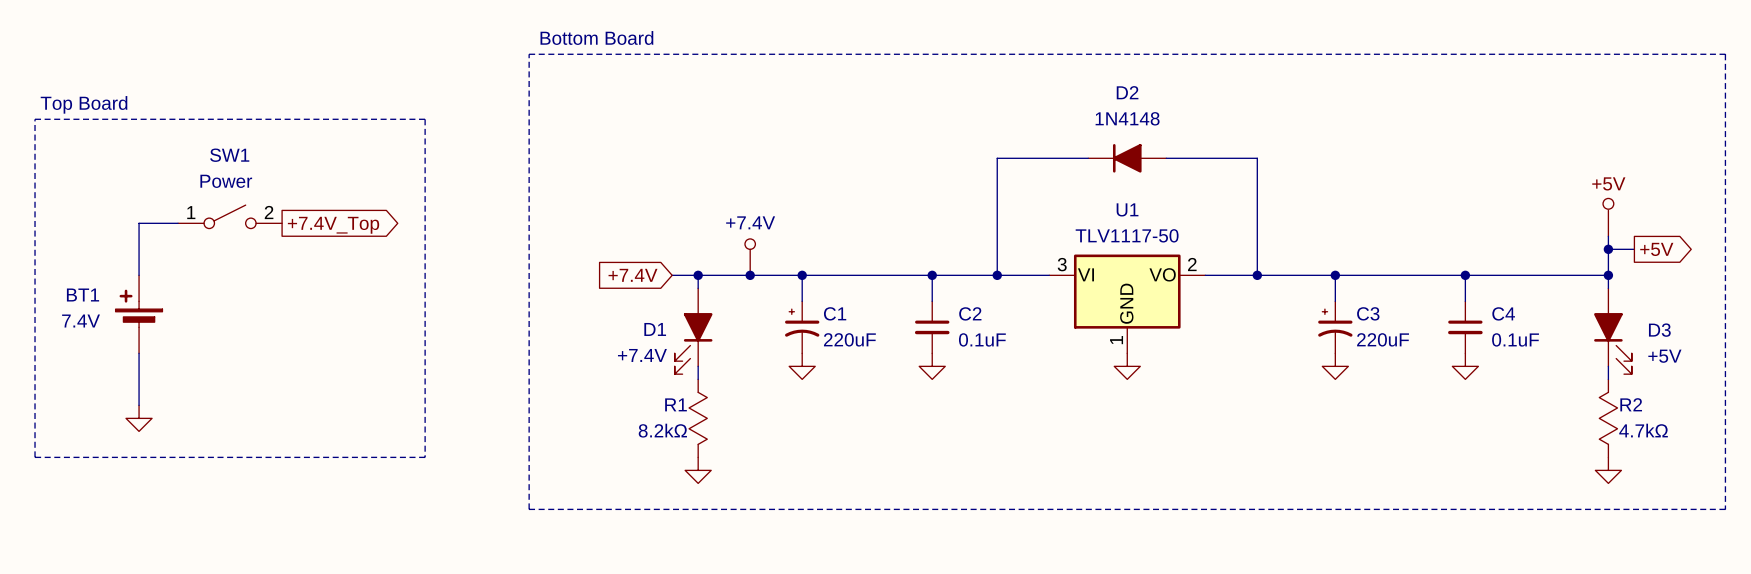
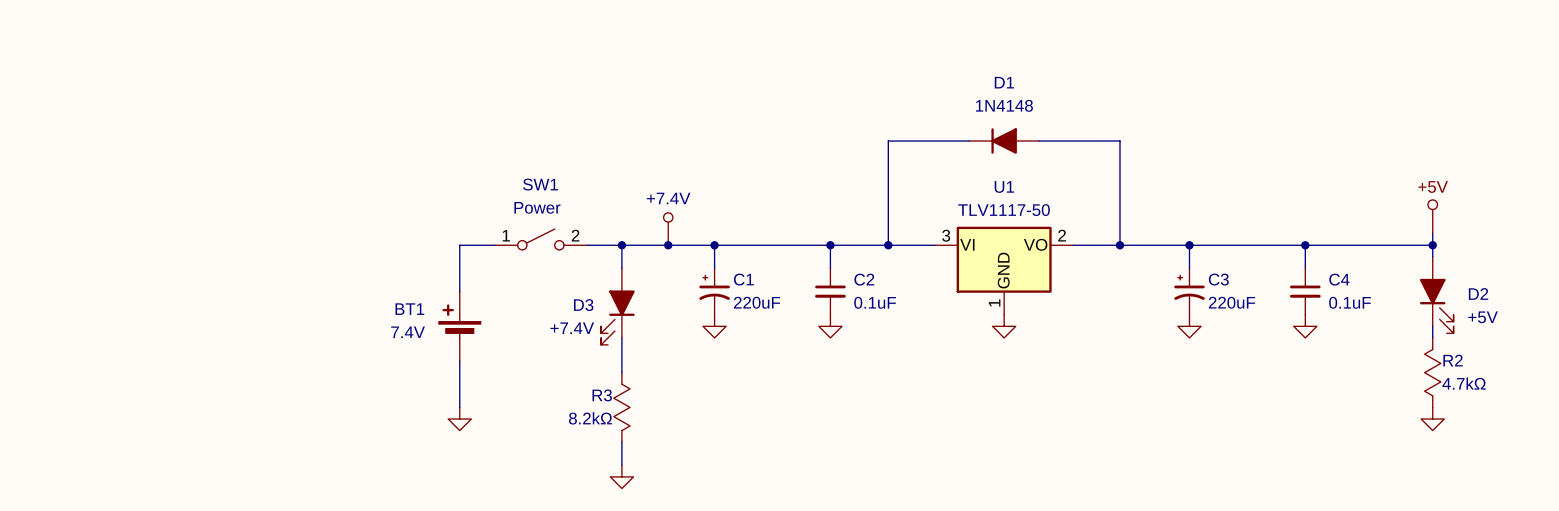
text: Bottom Board (596, 37) -> none
line: (529, 54) (1725, 54) (1725, 509) (529, 509) (529, 54) -> none
D2 name: D2 (1127, 92) -> D1 (1004, 82)
text: Top Board (84, 104) -> none
line: (35, 119) (425, 119) (425, 457) (35, 457) (35, 119) -> none
SW1 position: (230, 216) -> (540, 239)
power symbol position: (1608, 217) -> (1432, 216)
wire: (178, 223) (139, 223) (139, 275) -> none
global label: +7.4V_Top (333, 225) -> none
wire: (1608, 249) (1634, 249) -> none
junction: (1608, 249) -> none
global label: +5V (1656, 249) -> none
wire: none -> (494, 245) (459, 245) (459, 291)
global label: +7.4V (633, 275) -> none
wire: none -> (587, 245) (598, 245)
BT1 position: (139, 314) -> (459, 326)
D3 name: D3 (1659, 330) -> D2 (1478, 293)
D1: +7.4V (693, 331) -> none
D3: none -> +7.4V (617, 306)
wire: (139, 353) (139, 405) -> none
wire: none -> (459, 361) (459, 407)
power symbol: (139, 418) -> none
R1: 8.2kΩ (698, 418) -> none
R3: none -> 8.2kΩ (621, 407)
power symbol: none -> (459, 419)
power symbol position: (698, 470) -> (621, 476)
wire: none -> (621, 442) (621, 465)

